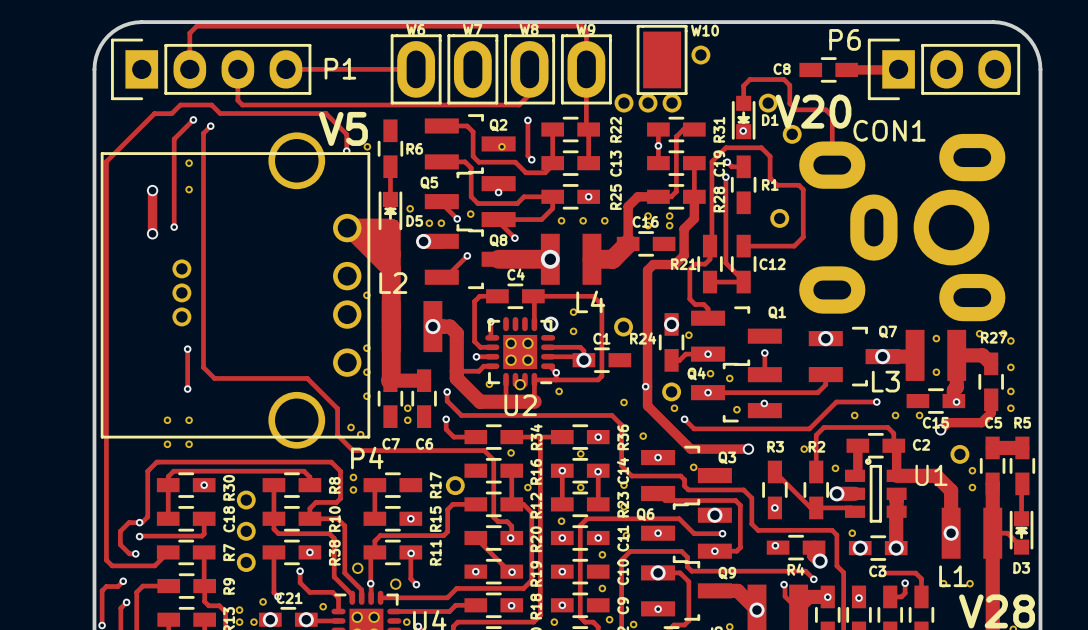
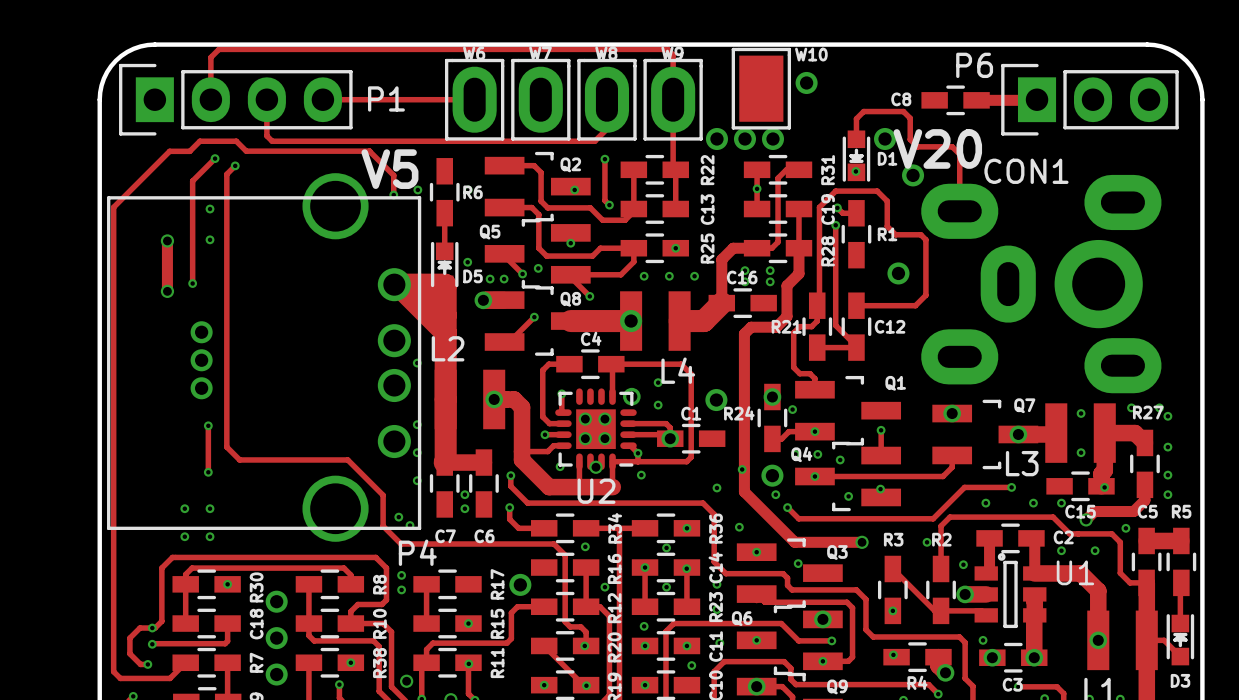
track: (887, 427) (893, 433) (893, 445) -> (1024, 517) (1053, 517) (1069, 533) (1111, 533) (1120, 542) (1120, 573) (1130, 582) (1146, 582)
part: none -> (1125, 528)
part: (959, 454) -> none
part: none -> (1061, 550)
part: none -> (1095, 550)
part: (972, 470) -> none
part: (972, 487) -> none

